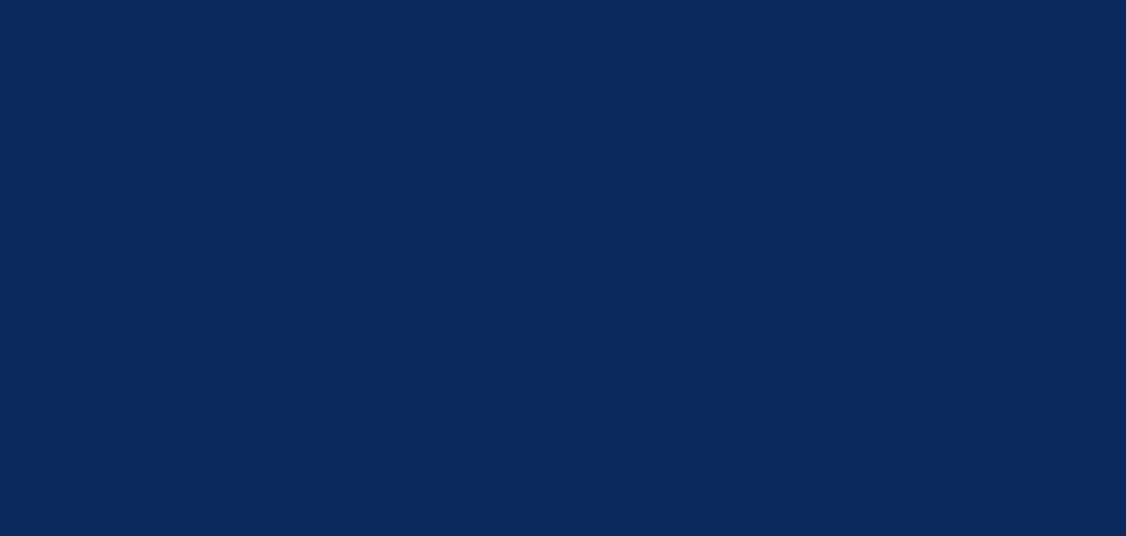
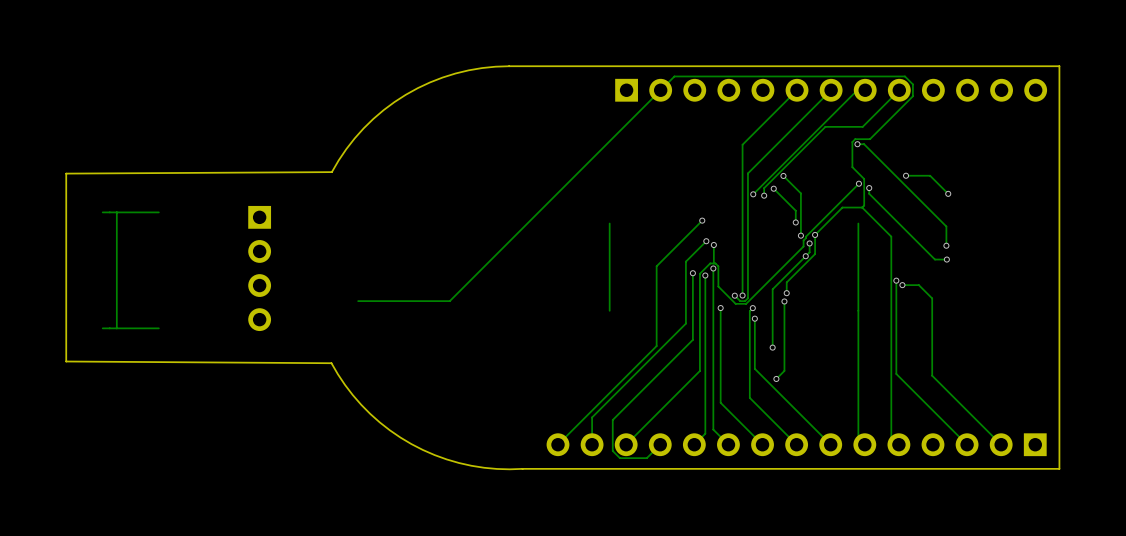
board edge: none -> (1059, 66) (509, 66) (482, 68) (442, 77) (417, 88) (394, 102) (373, 118) (354, 138) (331, 172) (66, 173) (66, 361) (331, 363) (345, 384) (361, 404) (379, 422) (400, 437) (422, 449) (446, 459) (484, 467) (1059, 468) (1059, 66)
track: none -> (797, 90) (742, 144) (742, 295)
track: none -> (831, 90) (747, 173) (747, 298) (745, 301) (740, 301) (734, 295)
part: none -> (831, 90)
track: none -> (865, 90) (857, 90) (753, 194)
track: none -> (899, 90) (862, 126) (825, 126) (764, 188) (764, 195)
track: none -> (857, 144) (864, 144) (946, 226) (946, 245)
via: none -> (857, 144)
track: none -> (783, 175) (800, 193) (800, 235)
via: none -> (783, 175)
track: none -> (906, 175) (930, 175) (948, 193)
via: none -> (906, 175)
track: none -> (858, 183) (805, 236) (803, 246) (746, 303) (735, 303) (718, 286) (718, 266) (715, 263) (710, 263) (699, 273) (699, 370) (626, 444)
via: none -> (858, 183)
track: none -> (773, 188) (795, 210) (795, 222)
via: none -> (773, 188)
track: none -> (869, 188) (869, 193) (934, 259) (946, 259)
via: none -> (869, 188)
via: none -> (948, 193)
via: none -> (753, 194)
via: none -> (764, 195)
track: none -> (862, 207) (842, 207) (815, 234) (815, 254) (786, 282) (786, 293)
track: none -> (862, 207) (891, 236) (891, 437) (898, 444)
track: none -> (862, 207) (864, 205) (864, 179) (852, 167) (852, 142) (855, 139) (870, 139) (912, 96) (912, 84) (904, 76) (674, 76) (449, 301) (358, 301)
track: none -> (116, 212) (116, 328)
track: none -> (158, 212) (102, 212)
track: none -> (702, 220) (656, 266) (656, 346) (558, 444)
via: none -> (702, 220)
via: none -> (795, 222)
track: none -> (609, 223) (609, 310)
track: none -> (858, 223) (858, 438) (864, 444)
via: none -> (815, 234)
via: none -> (800, 235)
track: none -> (706, 241) (685, 261) (685, 323) (592, 417) (592, 444)
via: none -> (706, 241)
track: none -> (809, 243) (809, 252) (772, 289) (772, 347)
via: none -> (809, 243)
track: none -> (713, 244) (713, 263)
via: none -> (713, 244)
via: none -> (946, 245)
via: none -> (805, 256)
via: none -> (946, 259)
part: none -> (259, 268)
track: none -> (713, 268) (713, 429) (728, 444)
via: none -> (713, 268)
track: none -> (692, 273) (692, 339) (612, 420) (612, 450) (619, 458) (646, 458) (660, 444)
via: none -> (692, 273)
track: none -> (705, 275) (705, 433) (694, 444)
via: none -> (705, 275)
track: none -> (896, 280) (896, 373) (967, 444)
via: none -> (896, 280)
track: none -> (902, 285) (918, 285) (932, 298) (932, 375) (1001, 444)
via: none -> (902, 285)
via: none -> (786, 293)
via: none -> (734, 295)
via: none -> (742, 295)
track: none -> (784, 301) (784, 370) (776, 378)
via: none -> (784, 301)
track: none -> (720, 308) (720, 402) (762, 444)
via: none -> (720, 308)
track: none -> (752, 308) (749, 311) (749, 397) (796, 444)
via: none -> (752, 308)
track: none -> (754, 318) (754, 368) (830, 444)
via: none -> (754, 318)
track: none -> (158, 328) (102, 328)
via: none -> (772, 347)
via: none -> (776, 378)
part: none -> (796, 444)

